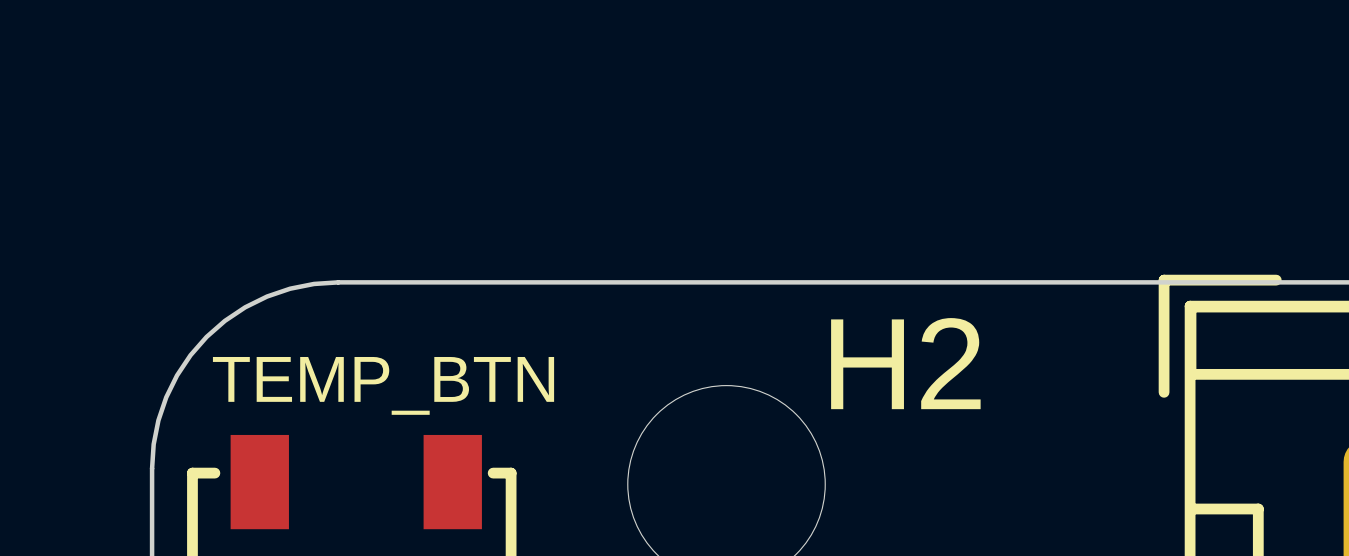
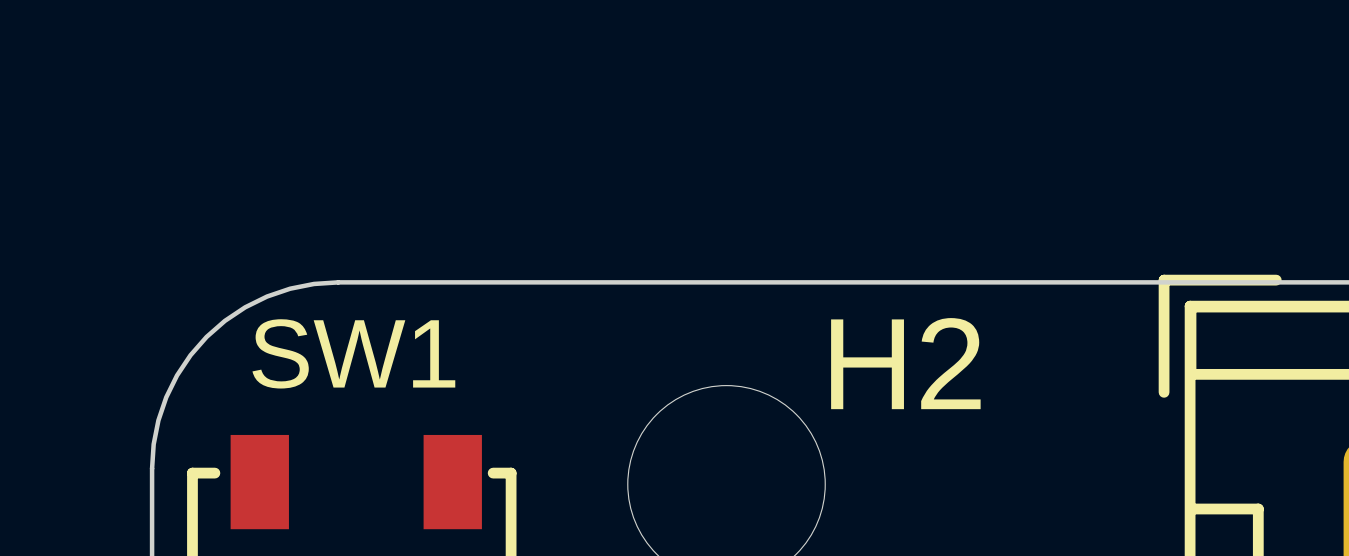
TEMP_BTN name: TEMP_BTN (383, 385) -> SW1 (353, 353)

